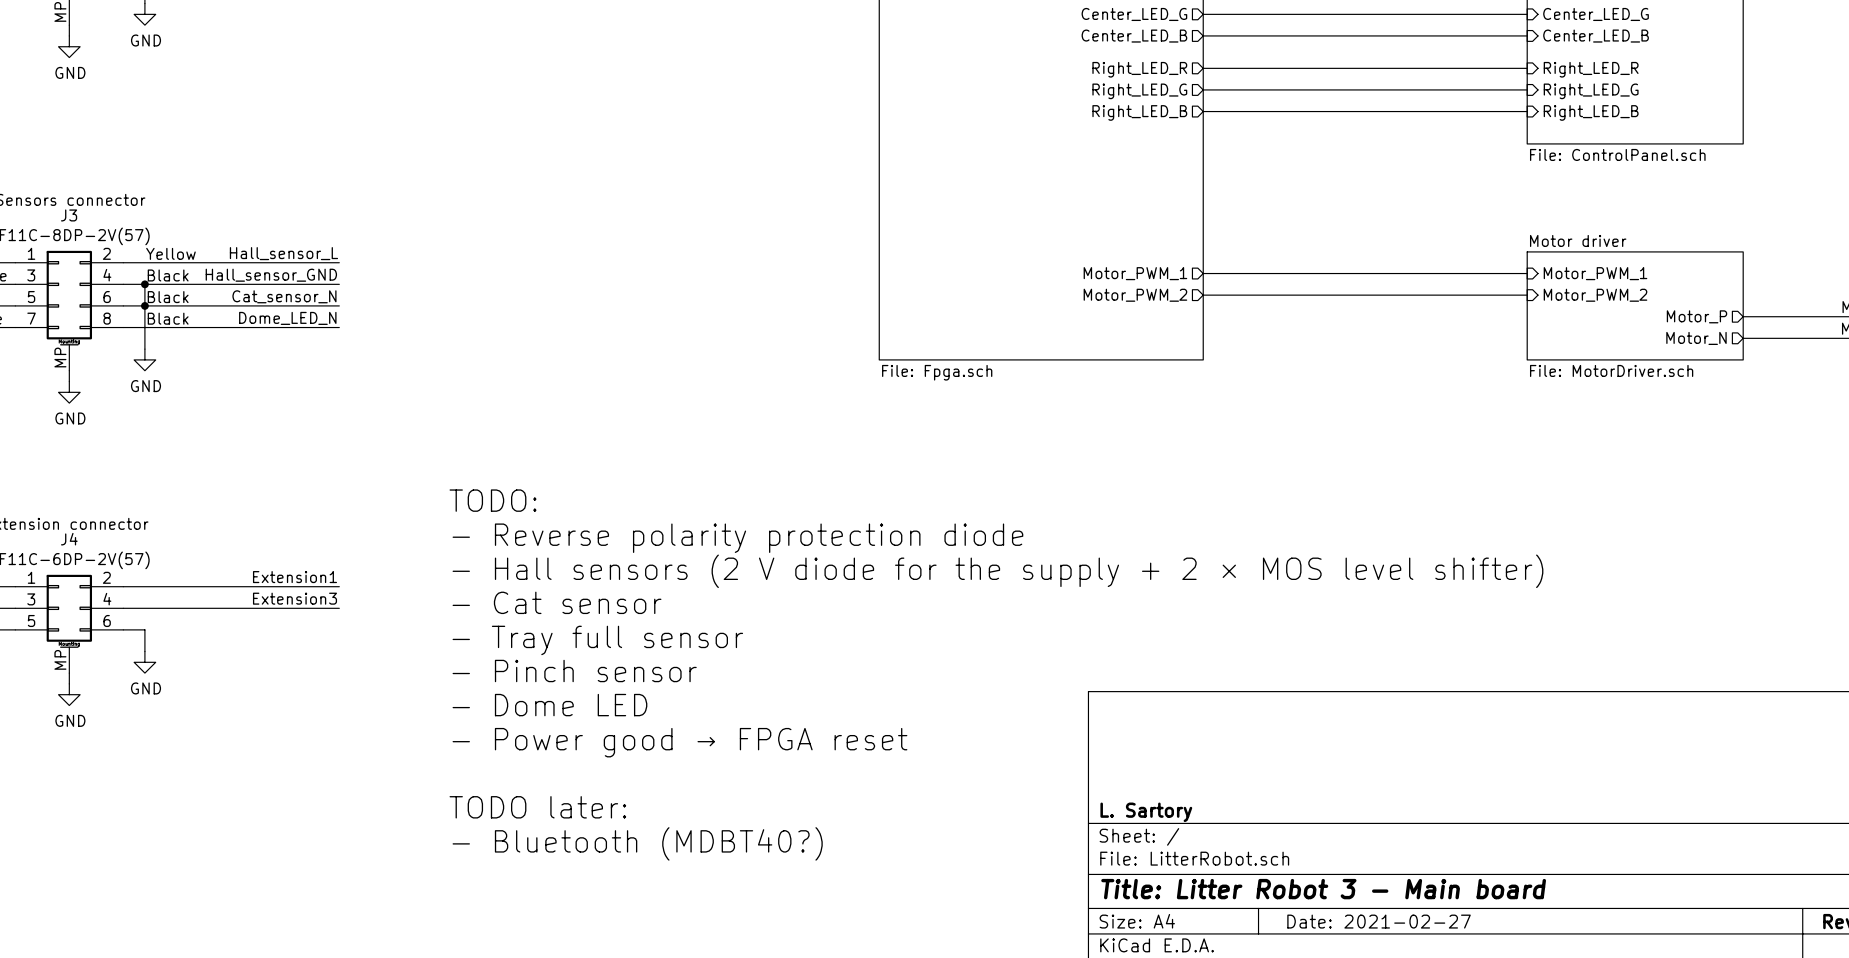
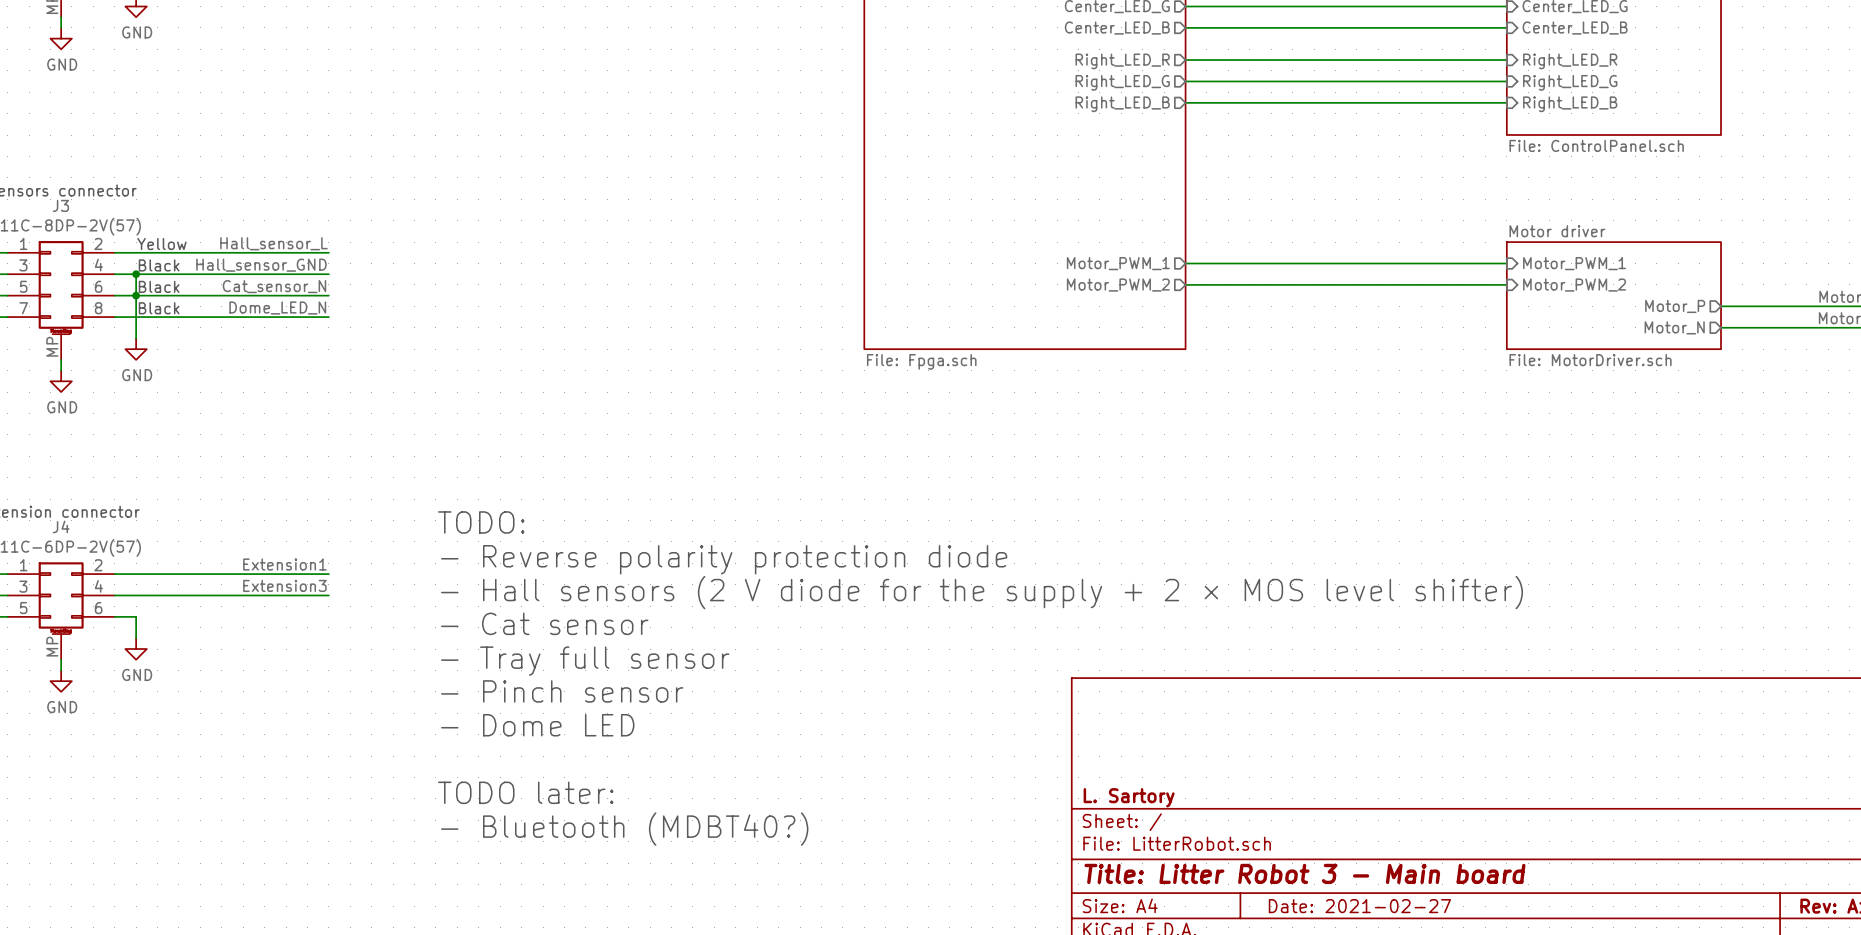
text: TODO: (493, 500) -> none
text: - Reverse polarity protection diode (737, 538) -> TODO: (481, 522)
text: - Hall sensors (2 V diode for the supply + 2 × MOS level shifter) (997, 571) -> - Reverse polarity protection diode (724, 559)
text: - Cat sensor (557, 602) -> - Hall sensors (2 V diode for the supply + 2 × MOS level shifter) (982, 592)
text: - Tray full sensor (597, 640) -> - Cat sensor (544, 623)
text: - Pinch sensor (574, 670) -> - Tray full sensor (585, 661)
text: - Dome LED (549, 705) -> - Pinch sensor (562, 691)
text: - Power good → FPGA reset (679, 742) -> - Dome LED (537, 725)

